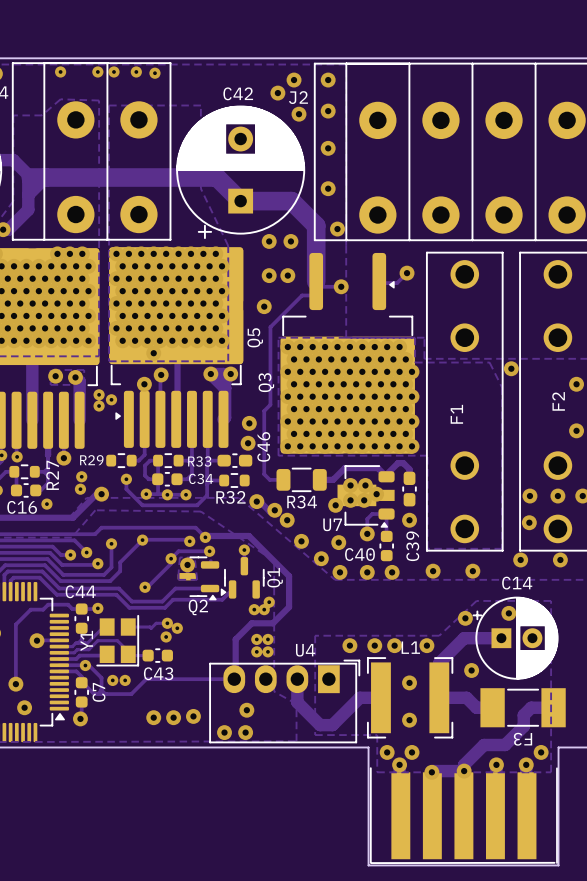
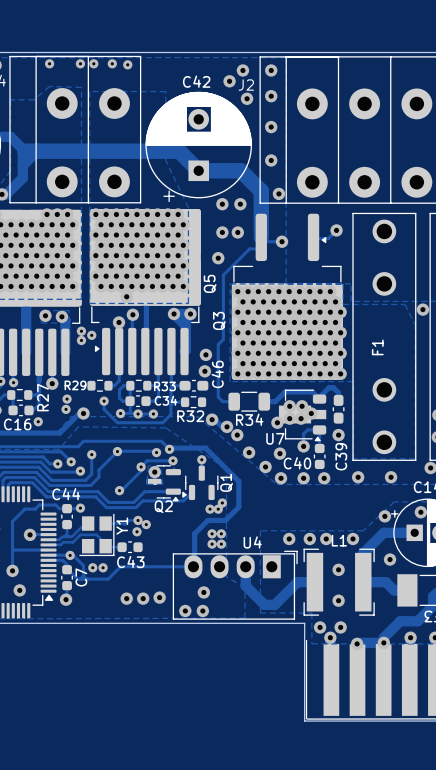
Y1 name position: Y1 (86, 640) -> Y1 (122, 526)
track: (105, 655) (79, 655) (76, 659) (59, 659) -> (12, 550) (48, 550)

